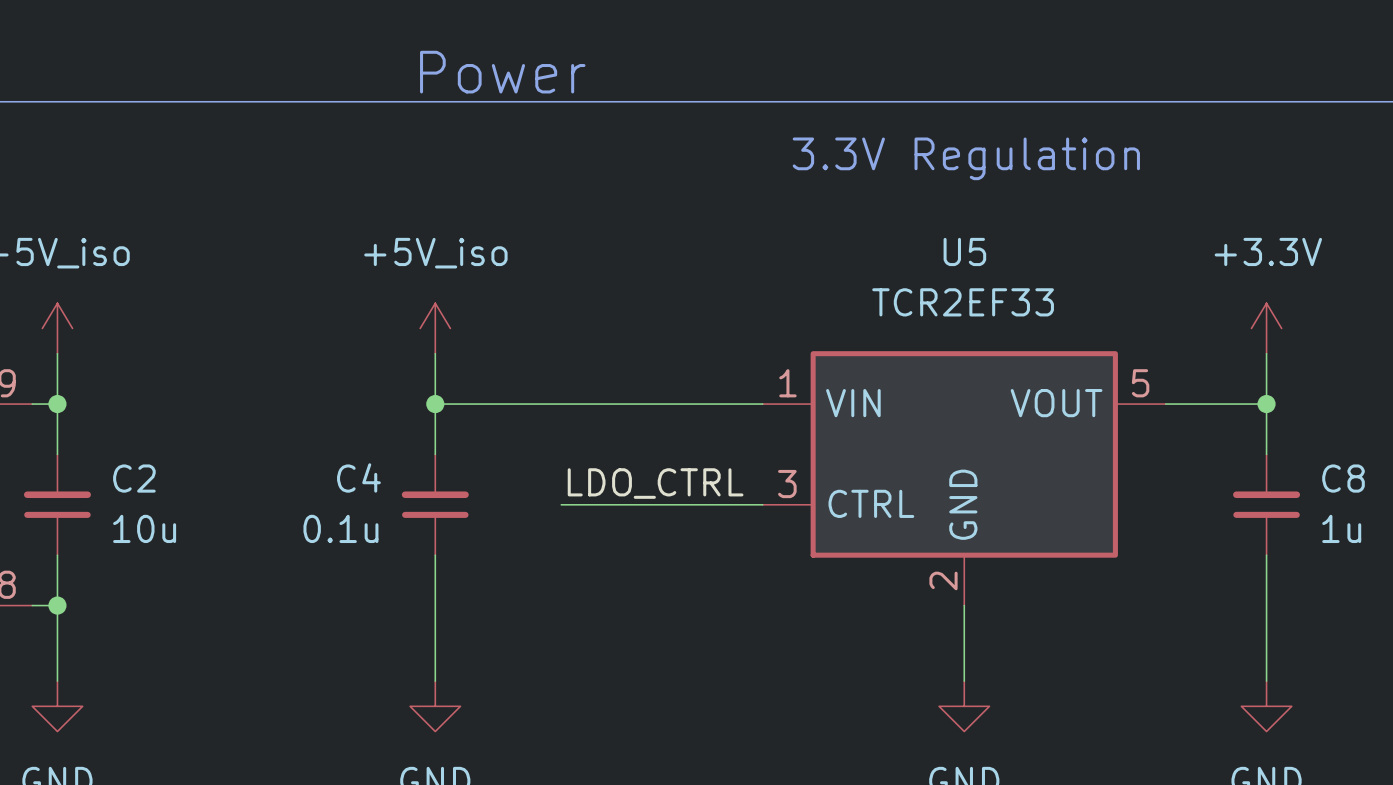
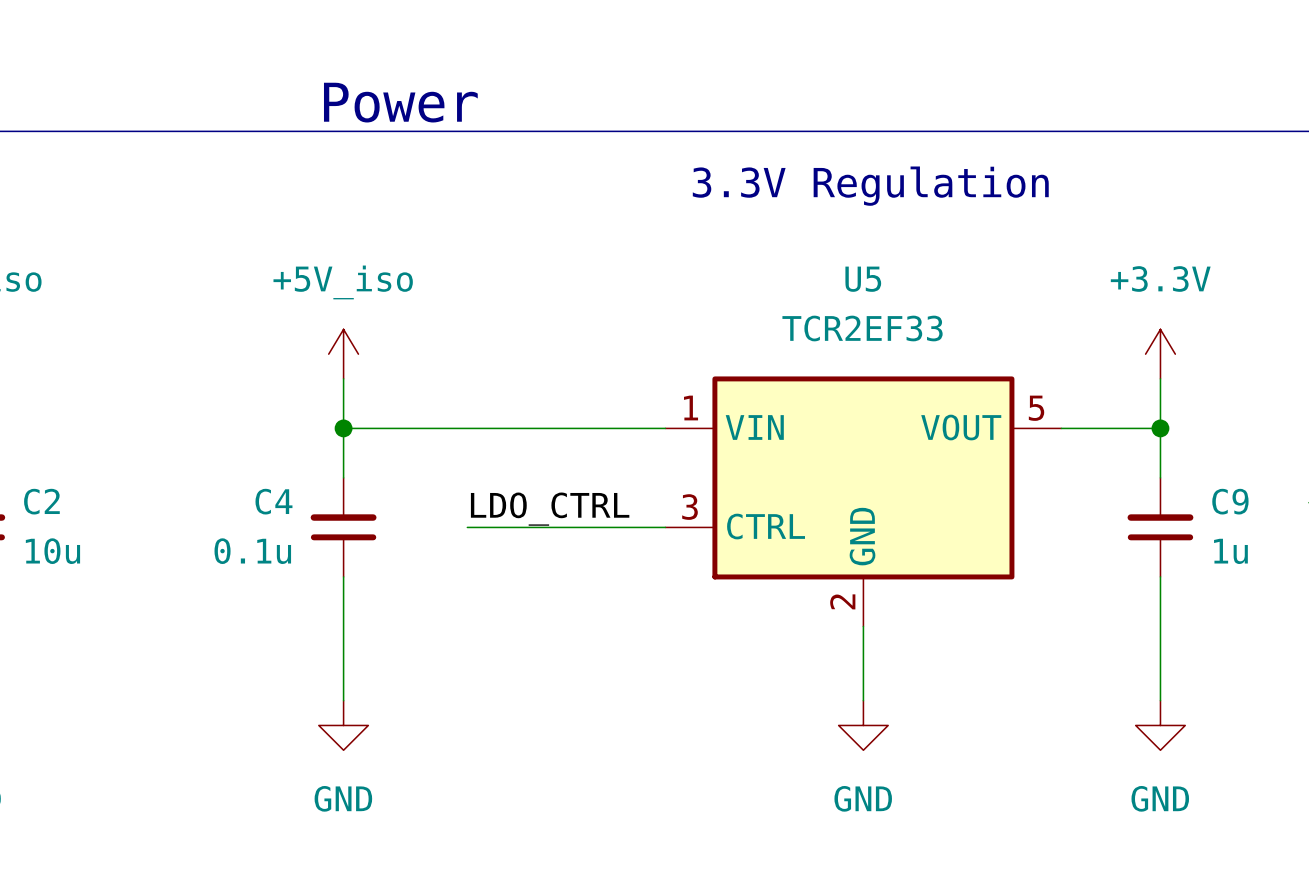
C8 name: C8 (1343, 478) -> C9 (1230, 501)

